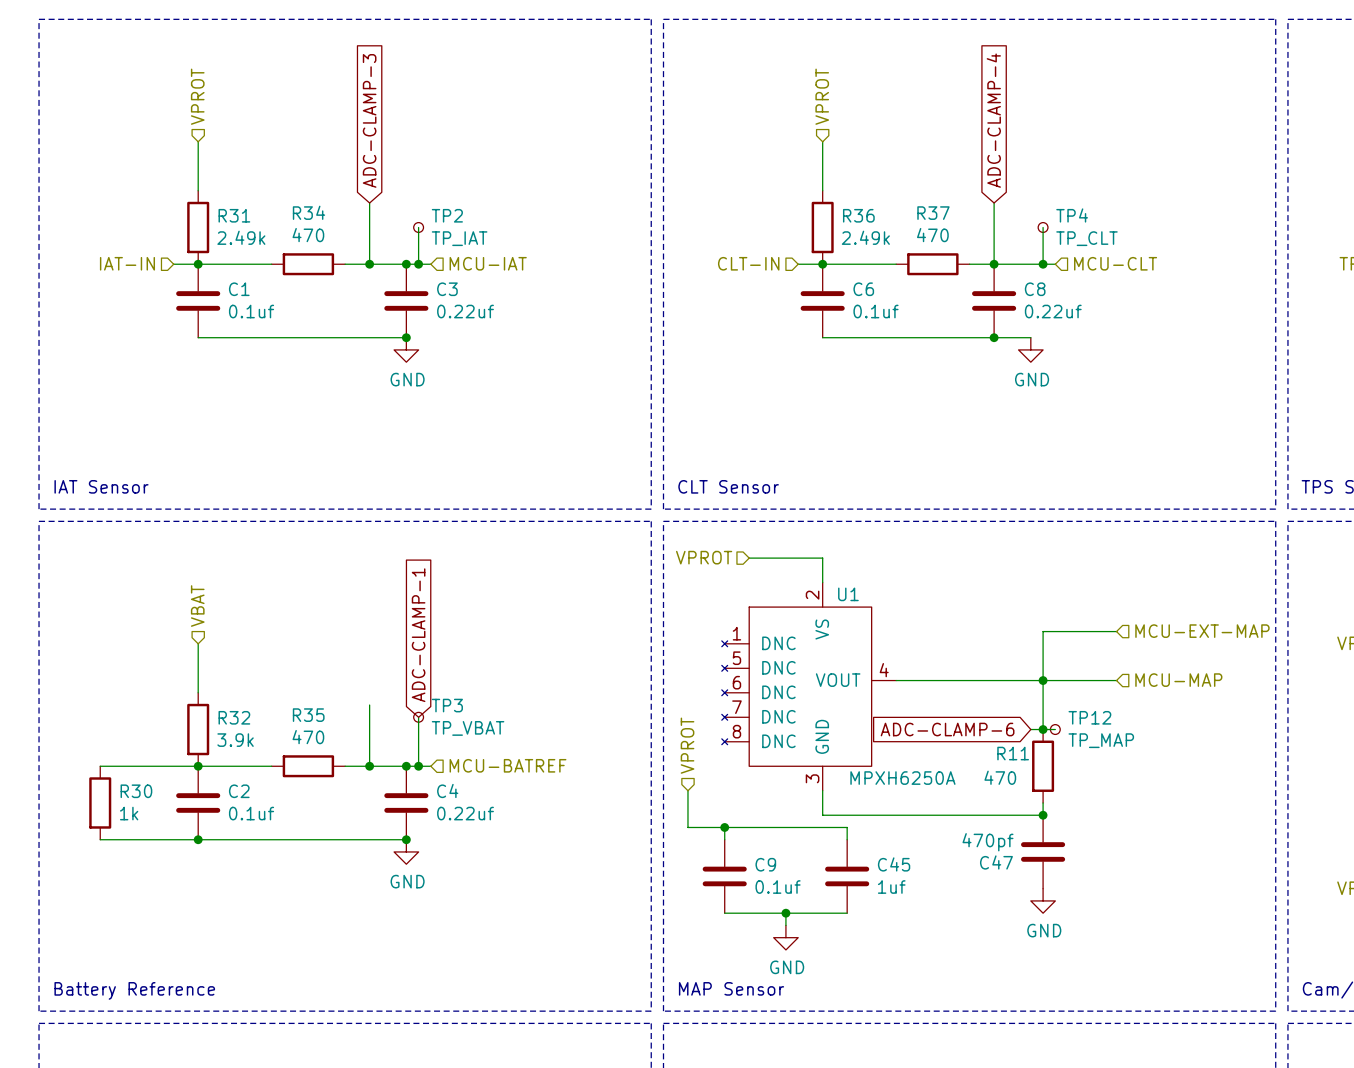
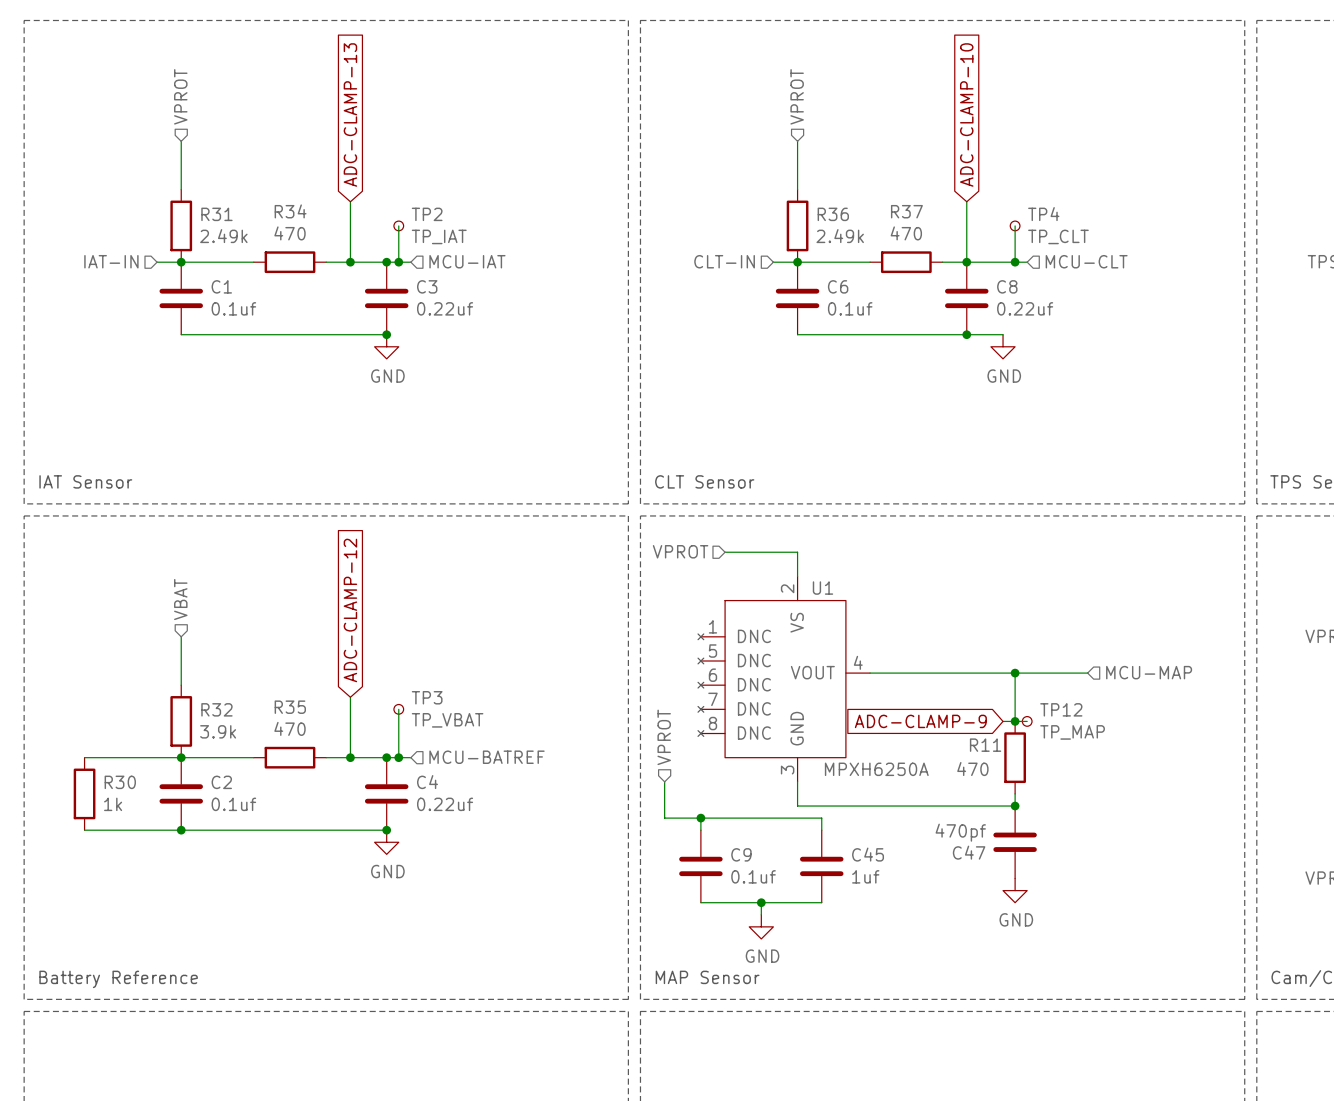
global label: ADC-CLAMP-3 (369, 120) -> ADC-CLAMP-13 (350, 115)
global label: ADC-CLAMP-4 (993, 120) -> ADC-CLAMP-10 (966, 115)
global label: none -> ADC-CLAMP-12 (350, 610)
wire: (1116, 631) (1043, 631) (1043, 680) -> none
hierarchical label: MCU-EXT-MAP (1202, 631) -> none
global label: ADC-CLAMP-1 (418, 635) -> none
global label: ADC-CLAMP-6 (947, 729) -> ADC-CLAMP-9 (920, 721)

